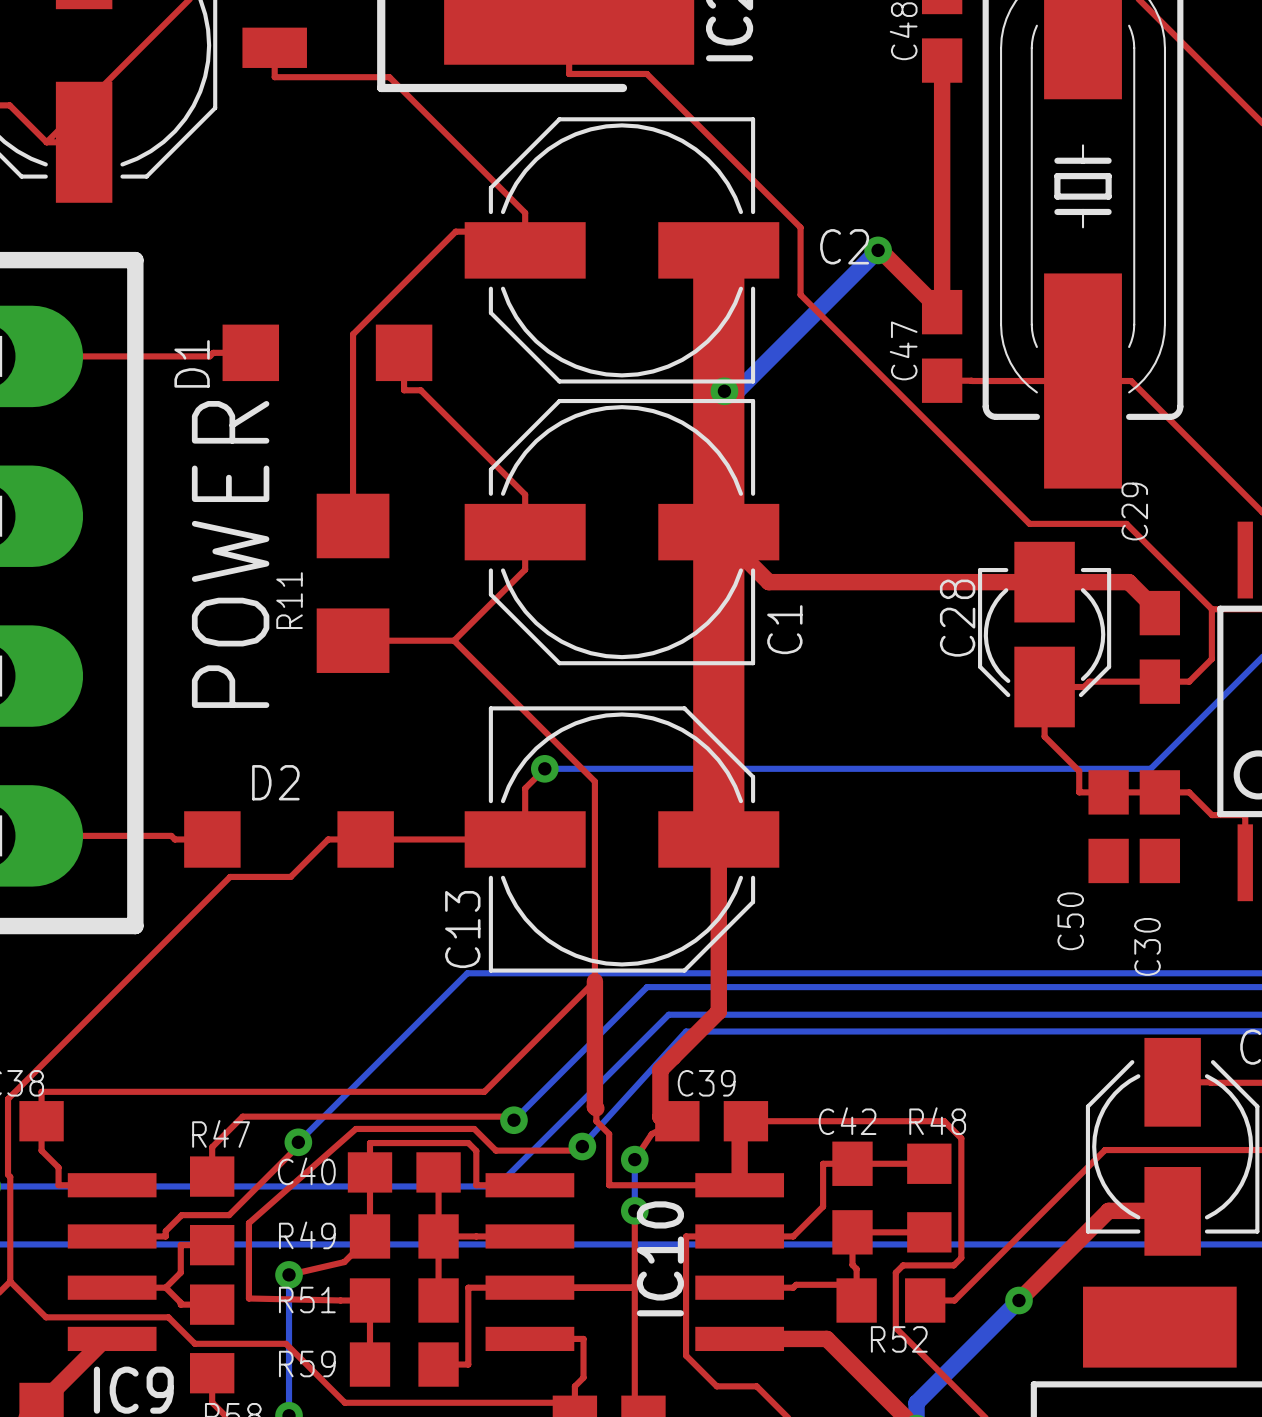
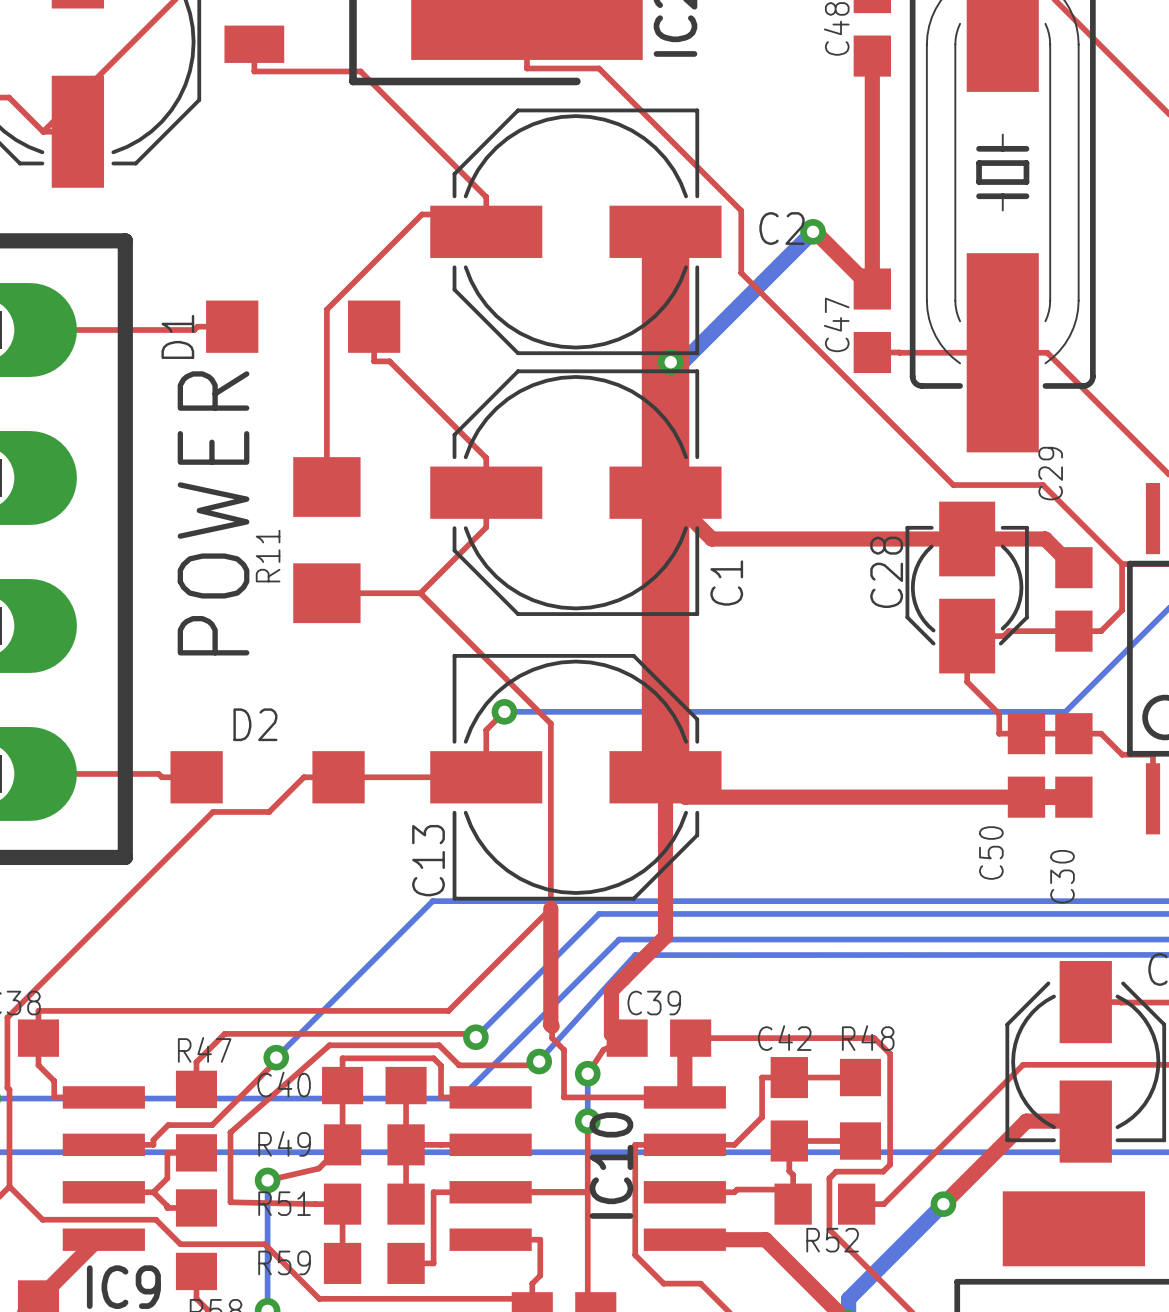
top track: none -> (665, 777) (685, 797) (1073, 797)

